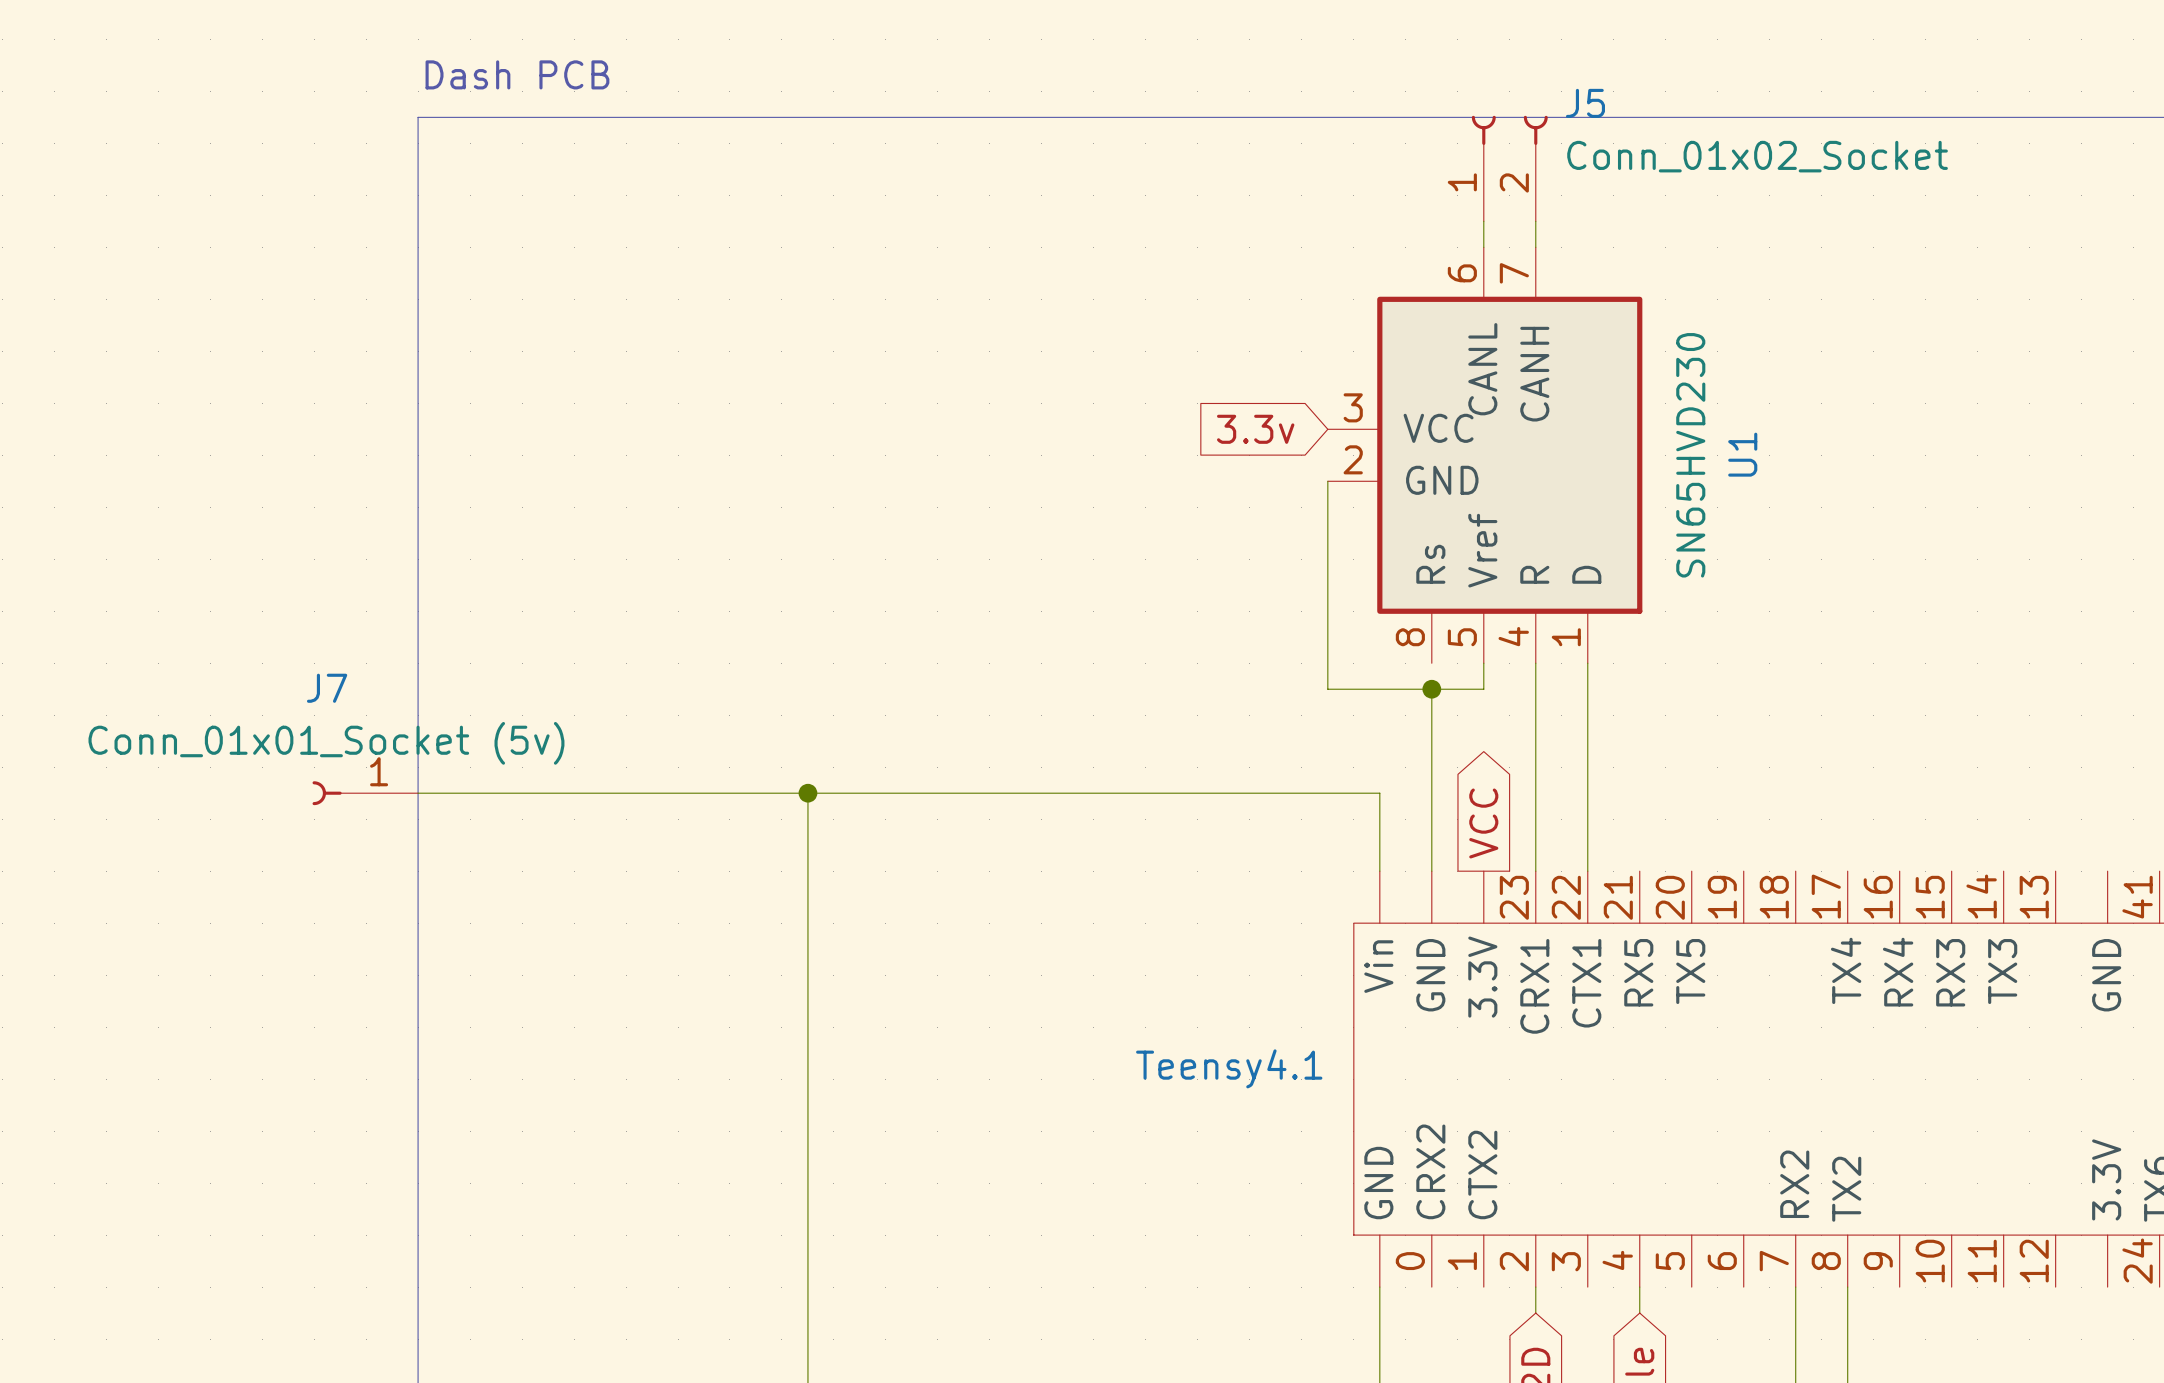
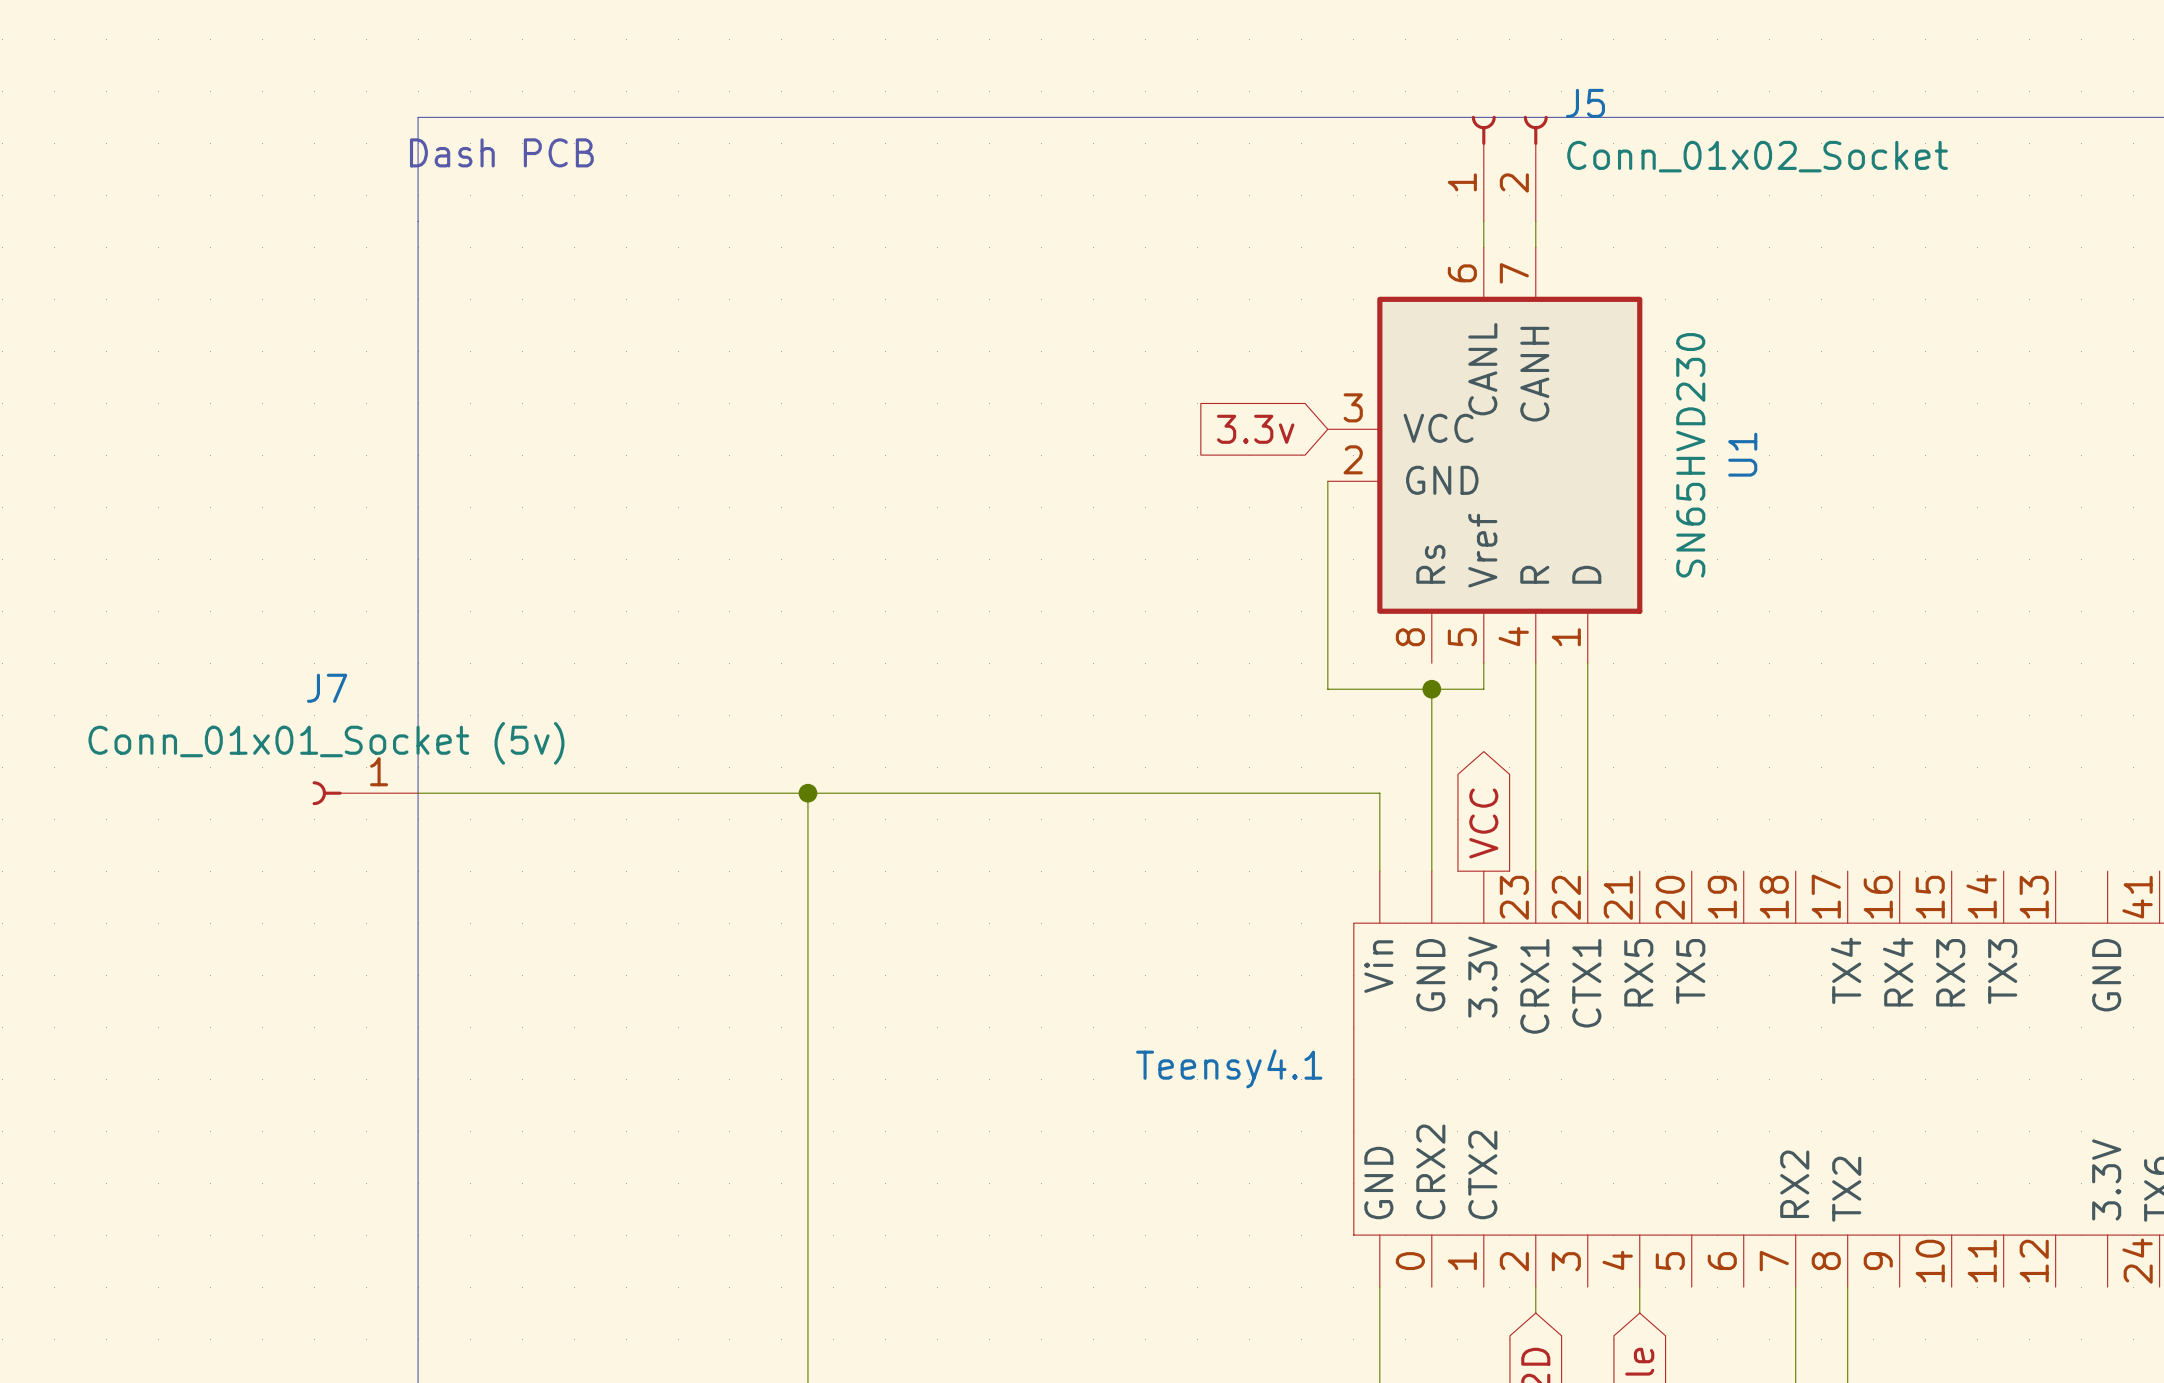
text position: Dash PCB (517, 74) -> Dash PCB (501, 152)

